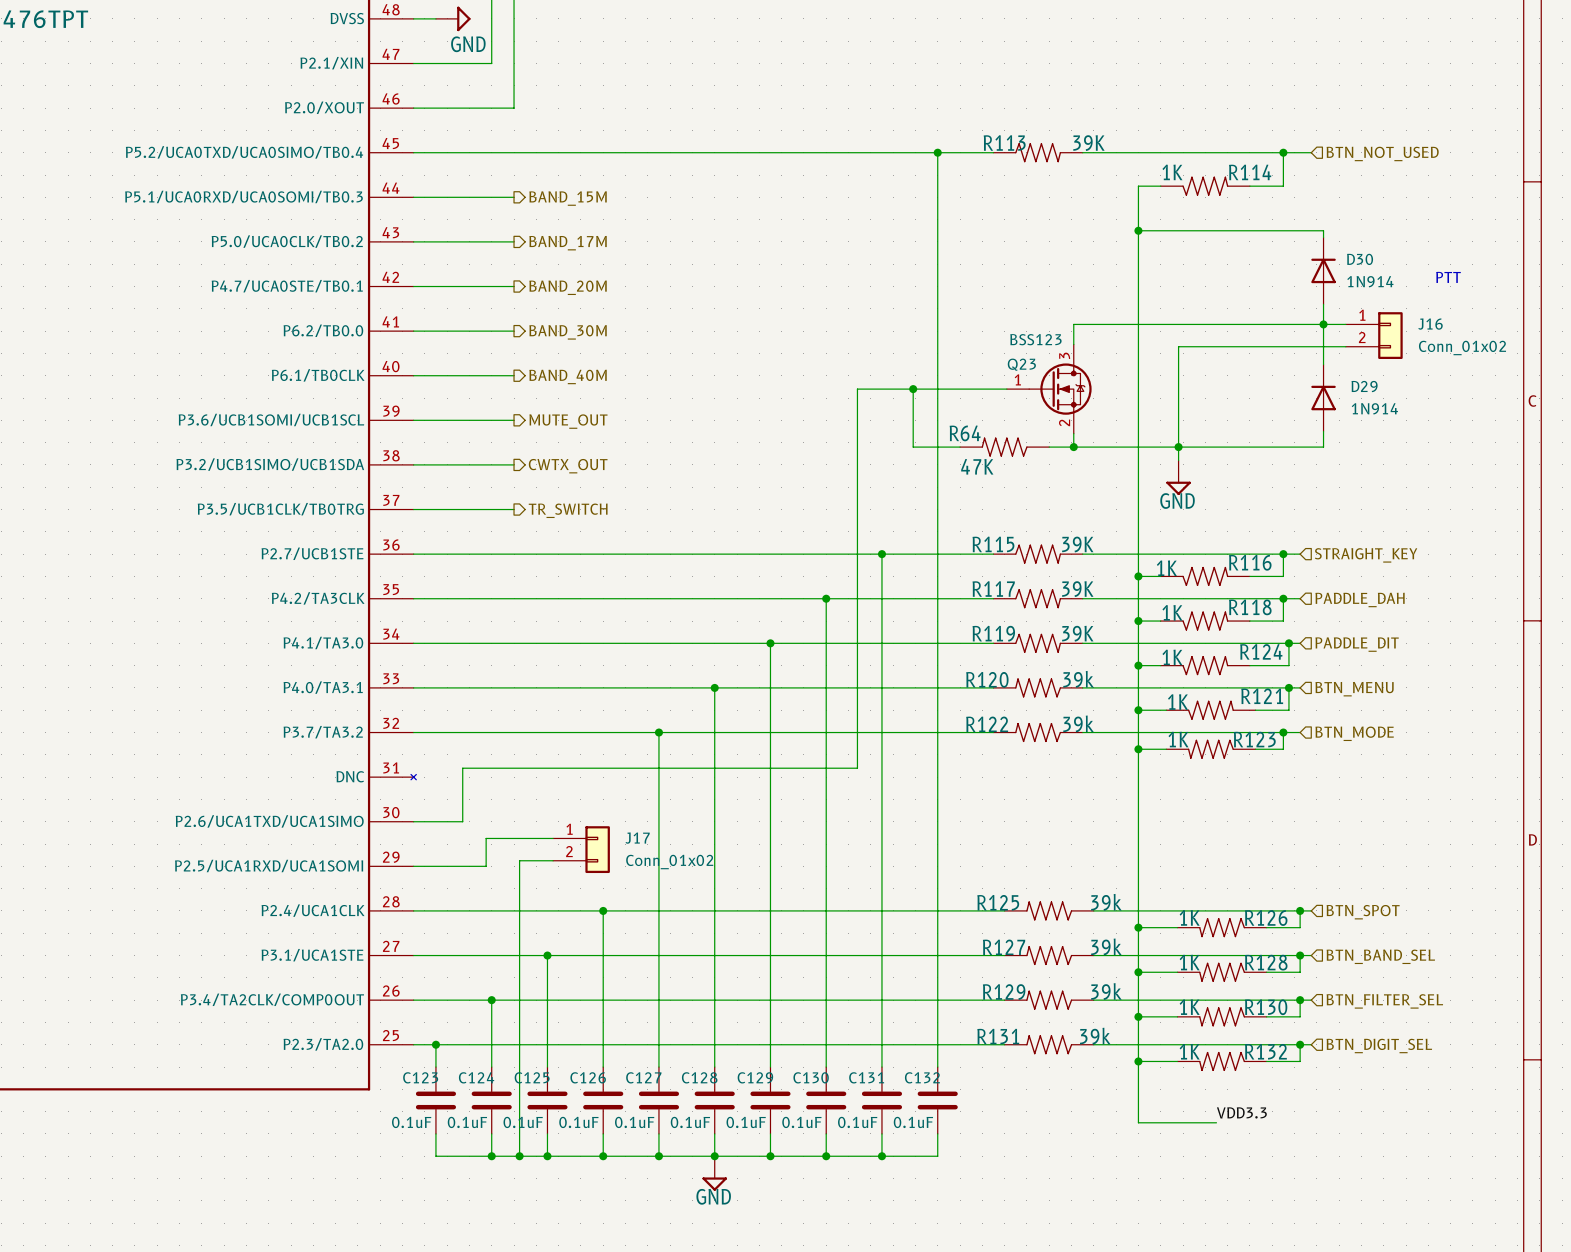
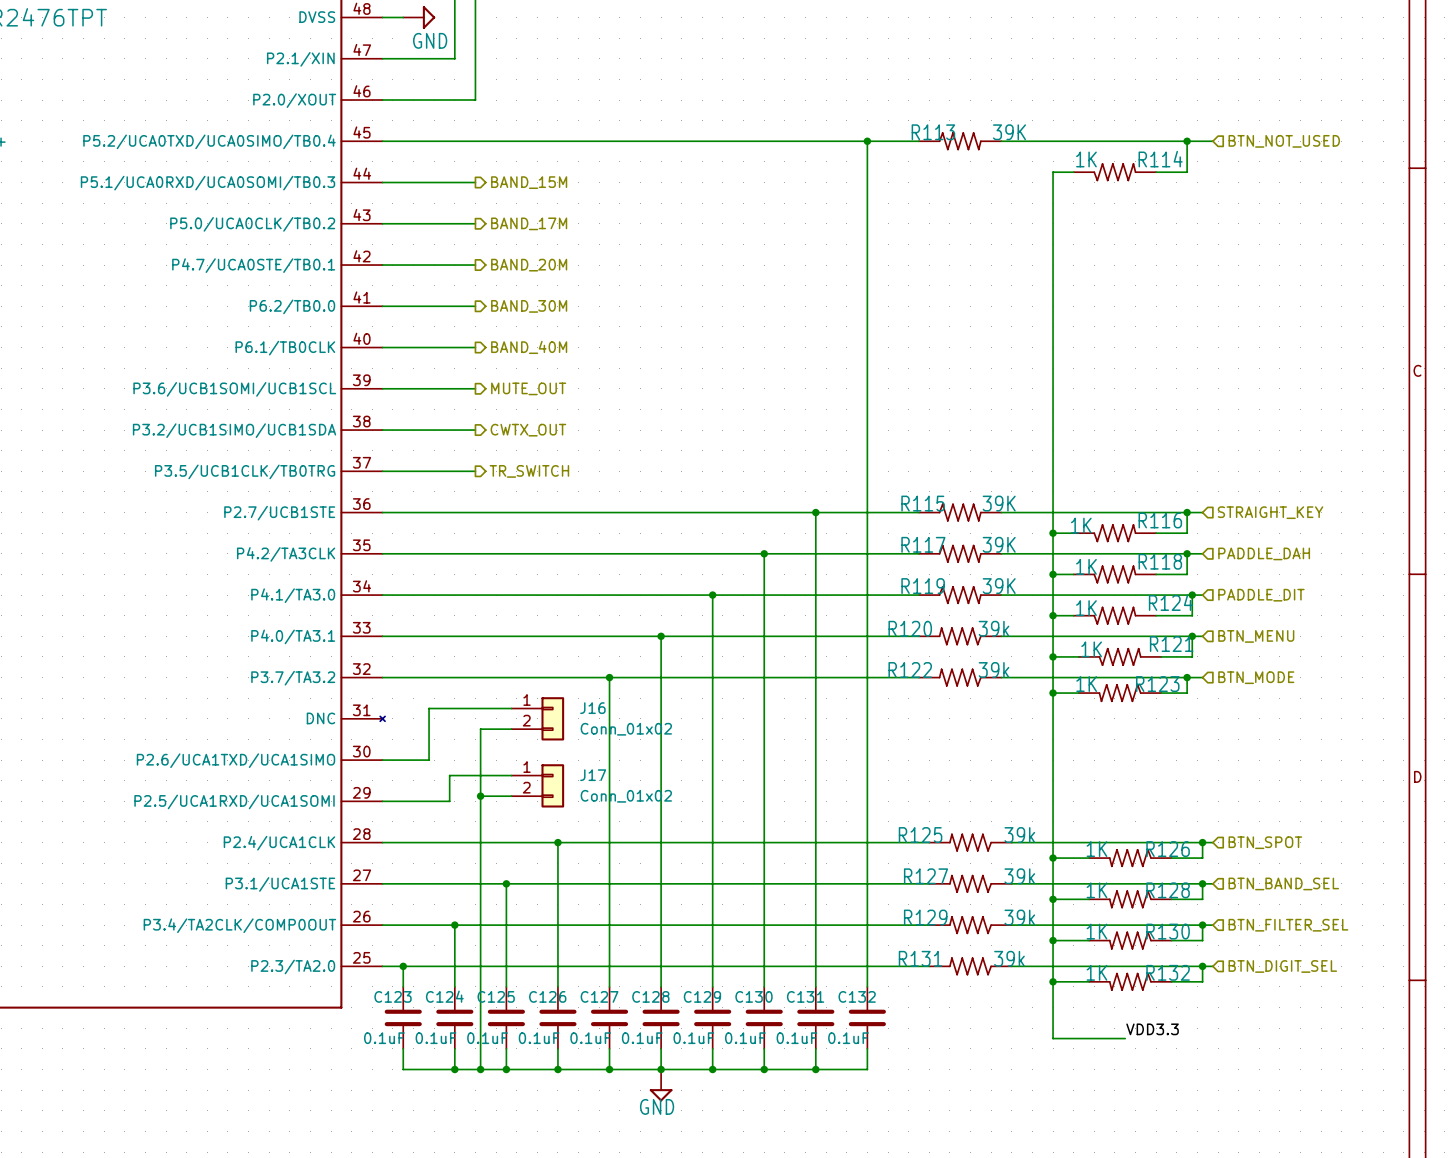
wire: (1138, 230) (1323, 230) (1323, 237) -> none
junction: (1138, 230) -> none
D30: 1N914 (1323, 270) -> none
text: PTT (1448, 277) -> none
wire: (1323, 304) (1323, 364) -> none
junction: (1323, 324) -> none
wire: (1345, 324) (1073, 324) (1073, 344) -> none
J16 position: (1374, 335) -> (537, 718)
wire: (1345, 346) (1178, 346) (1178, 460) -> none
wire: (913, 389) (913, 447) (960, 447) -> none
junction: (913, 389) -> none
wire: (1006, 389) (857, 389) (857, 768) (462, 768) (462, 821) -> (511, 708) (429, 708) (428, 760)
Q23: BSS123 (1049, 389) -> none
D29: 1N914 (1323, 398) -> none
wire: (1323, 431) (1323, 447) (1049, 447) -> none
wire: (1073, 433) (1073, 447) -> none
R64: 47K (1004, 447) -> none
junction: (1073, 447) -> none
junction: (1178, 447) -> none
power symbol: GND (1178, 477) -> none
wire: none -> (511, 729) (480, 729) (480, 796)
junction: none -> (480, 796)

